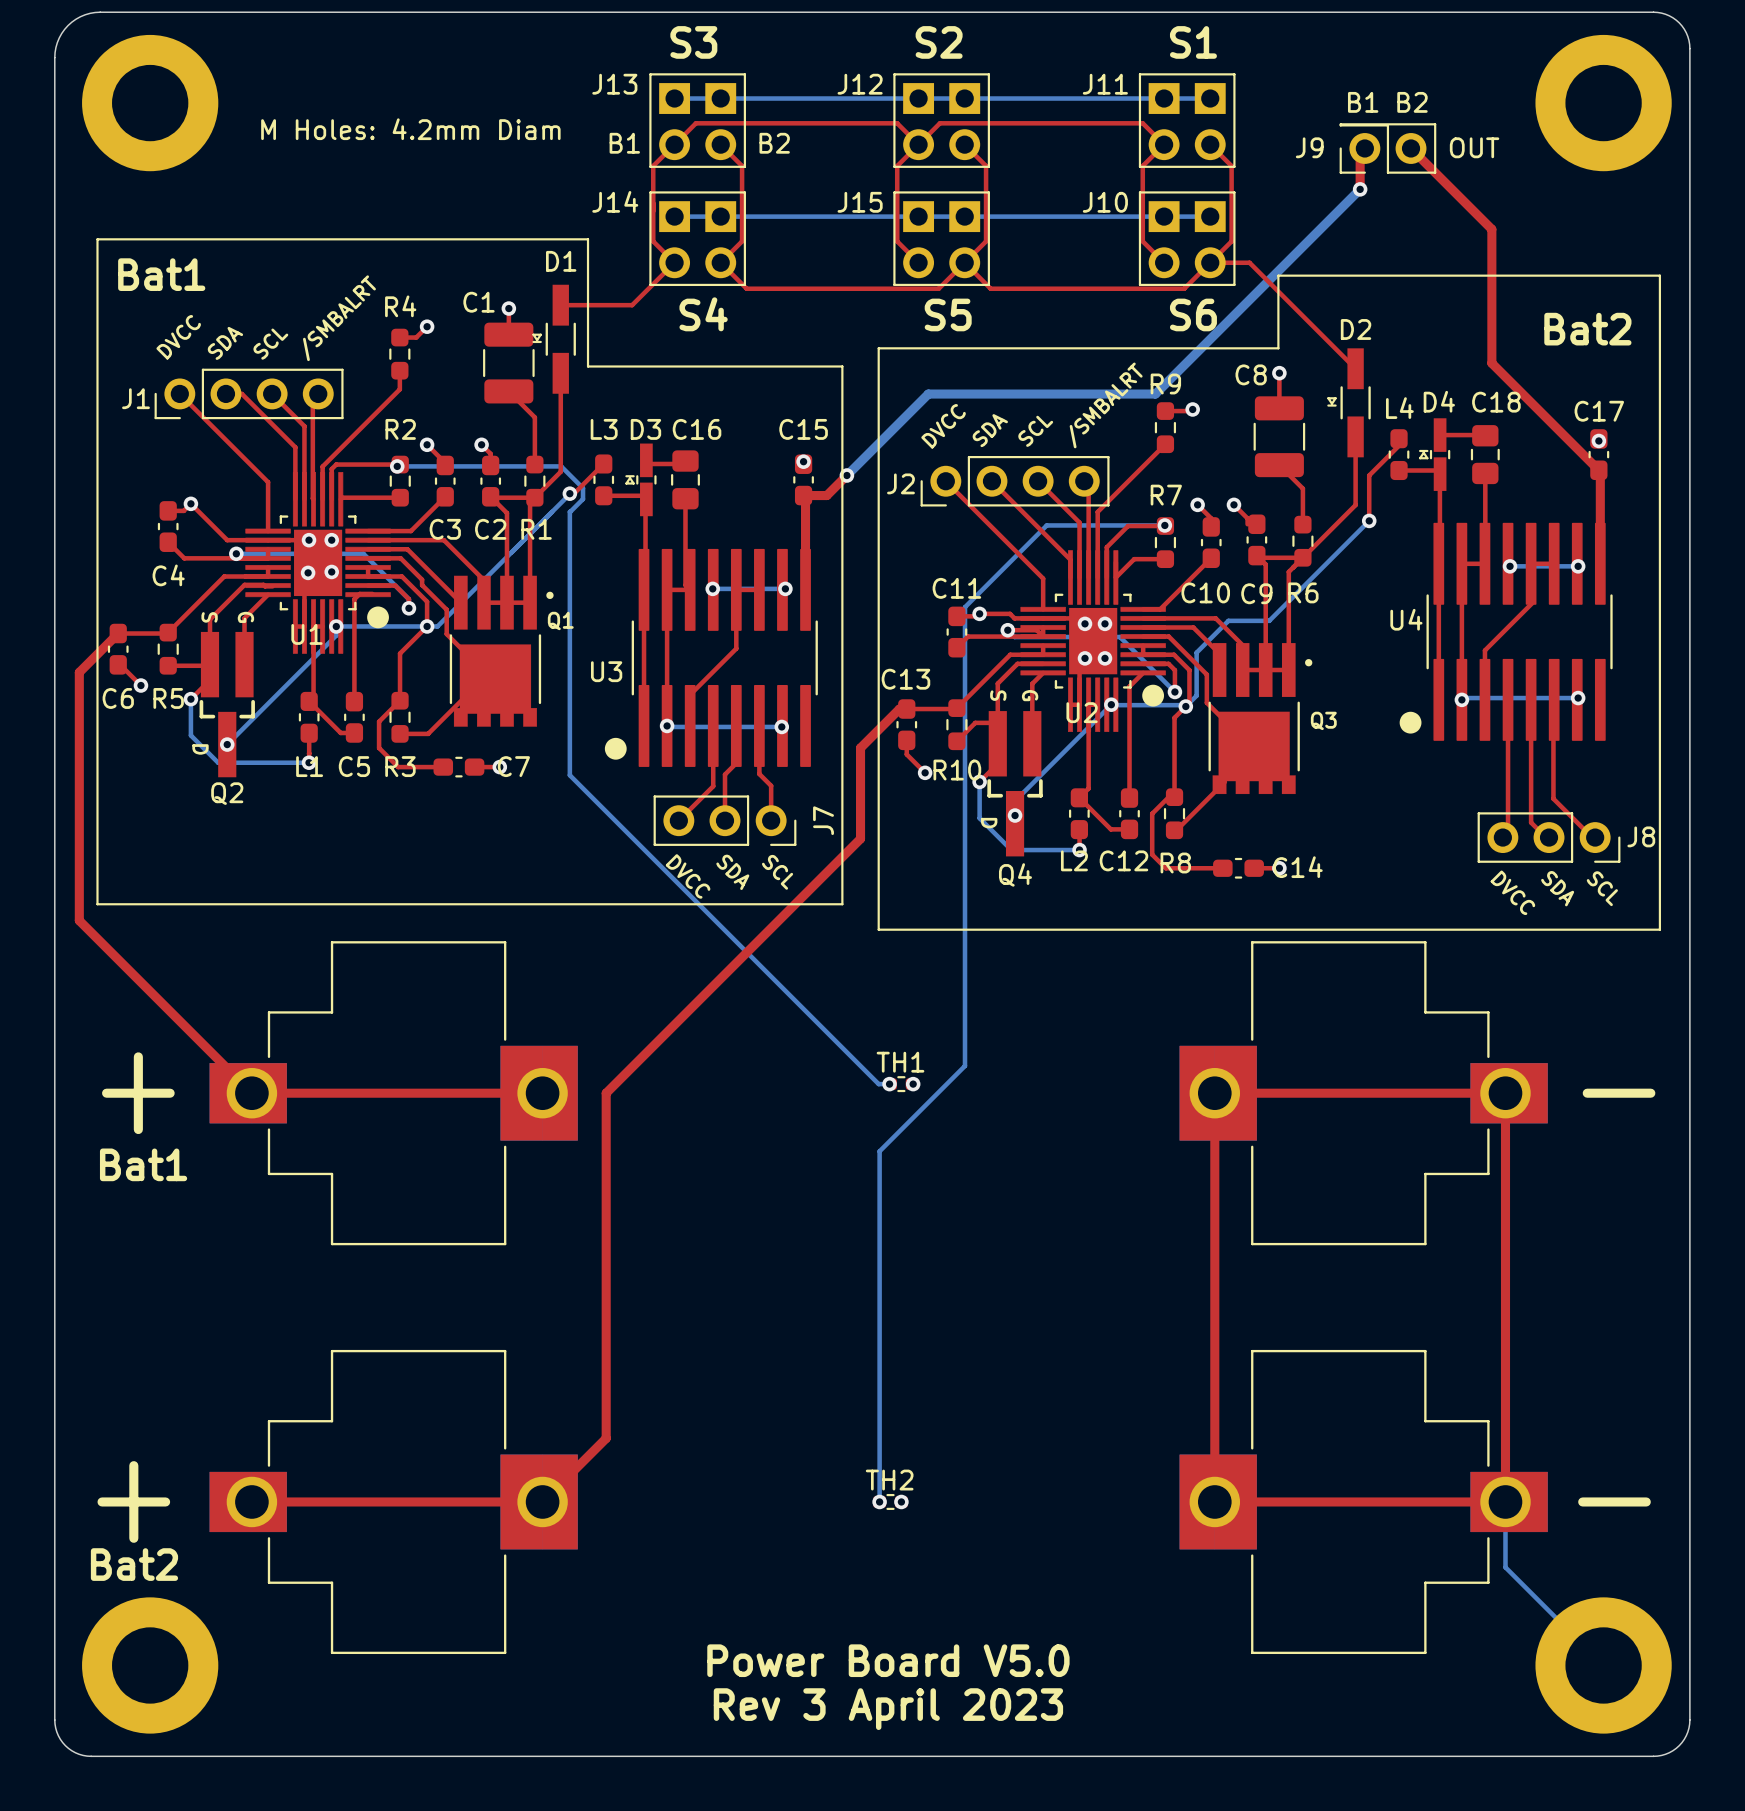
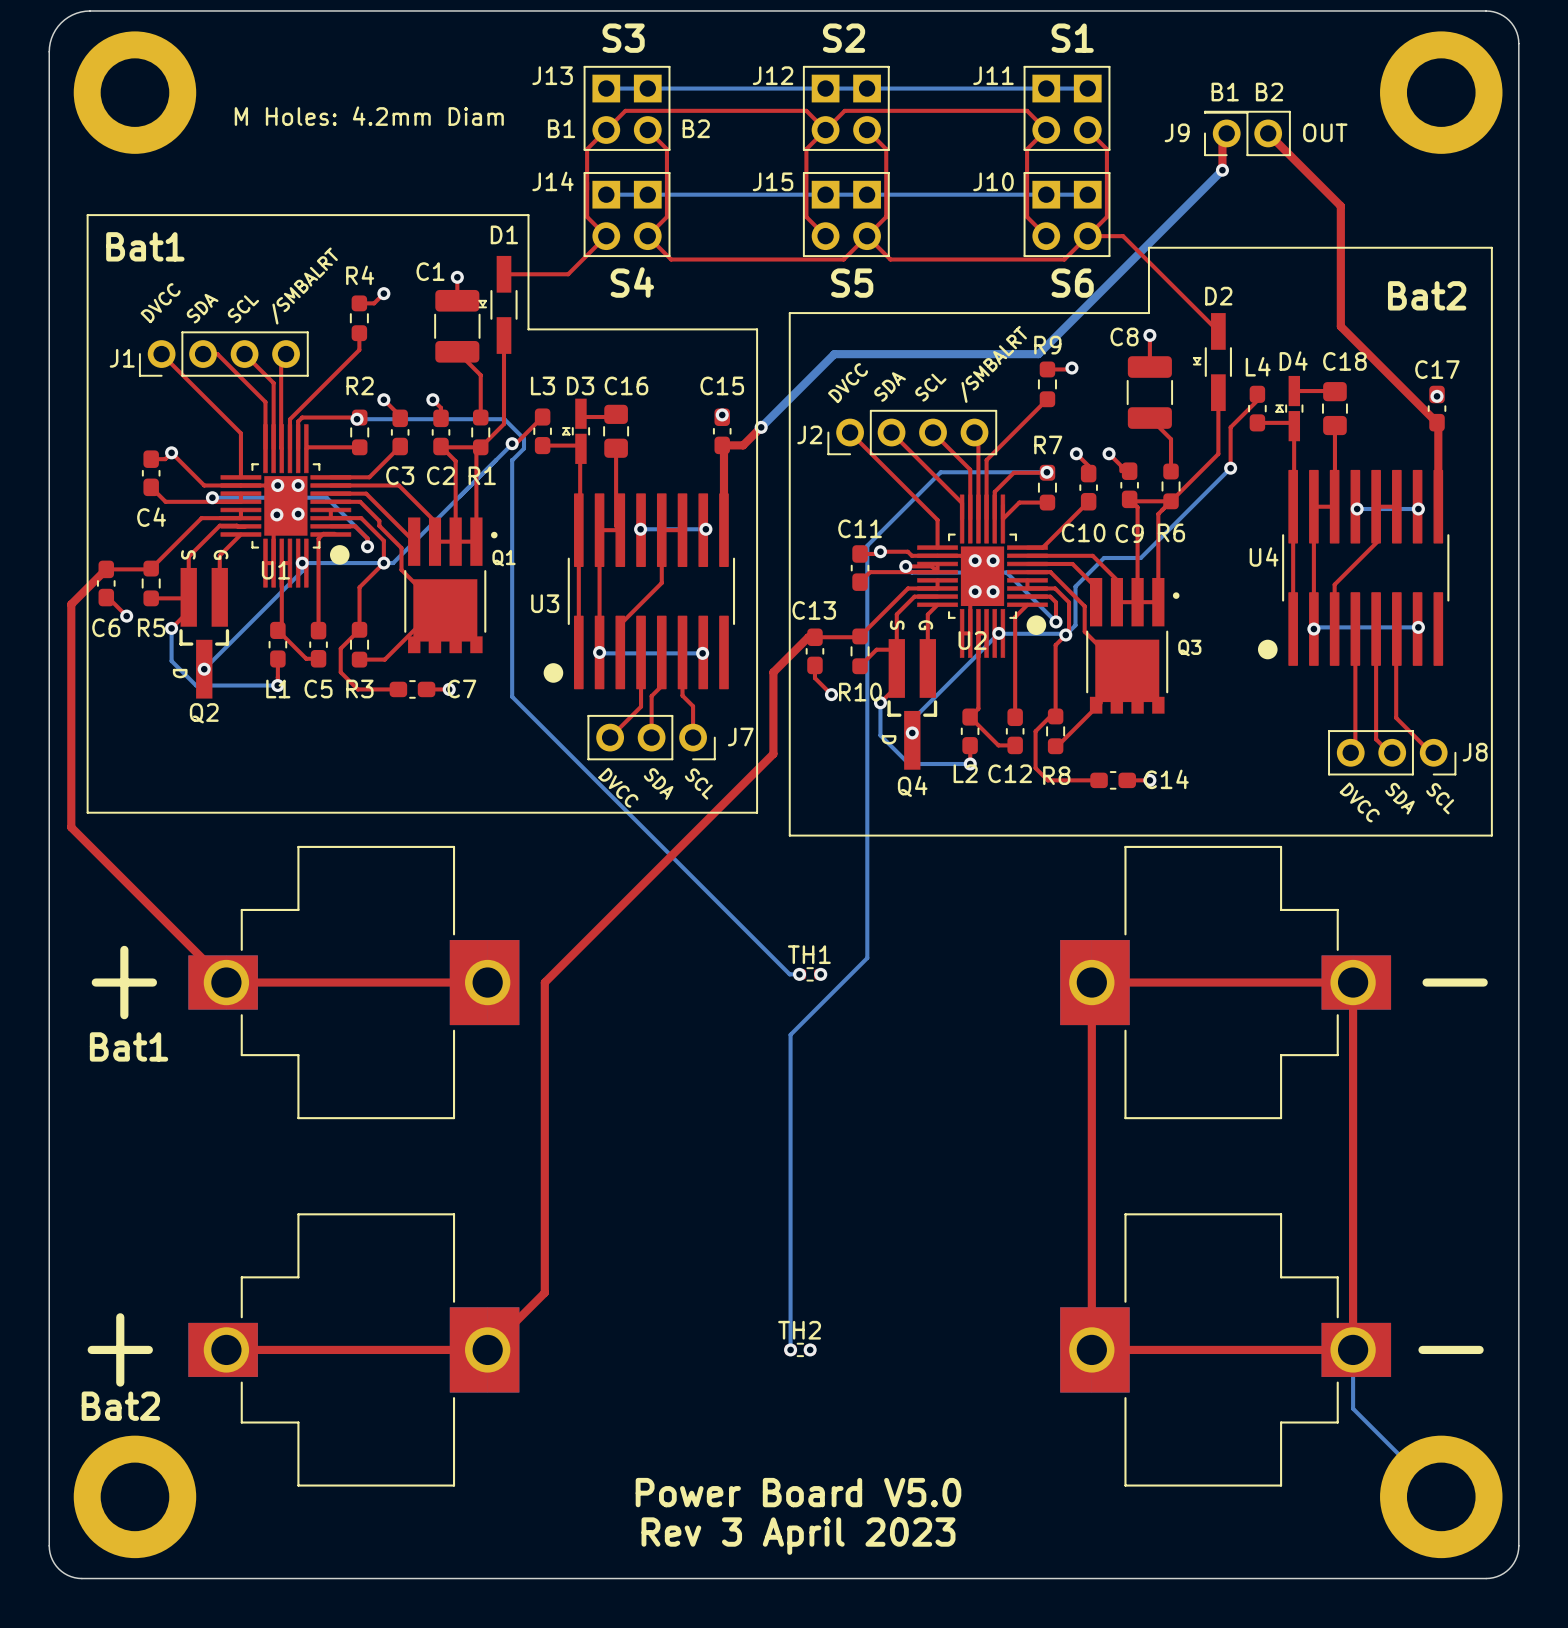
J7 name rotation: 0° (823, 820) -> 90° clockwise (740, 737)

